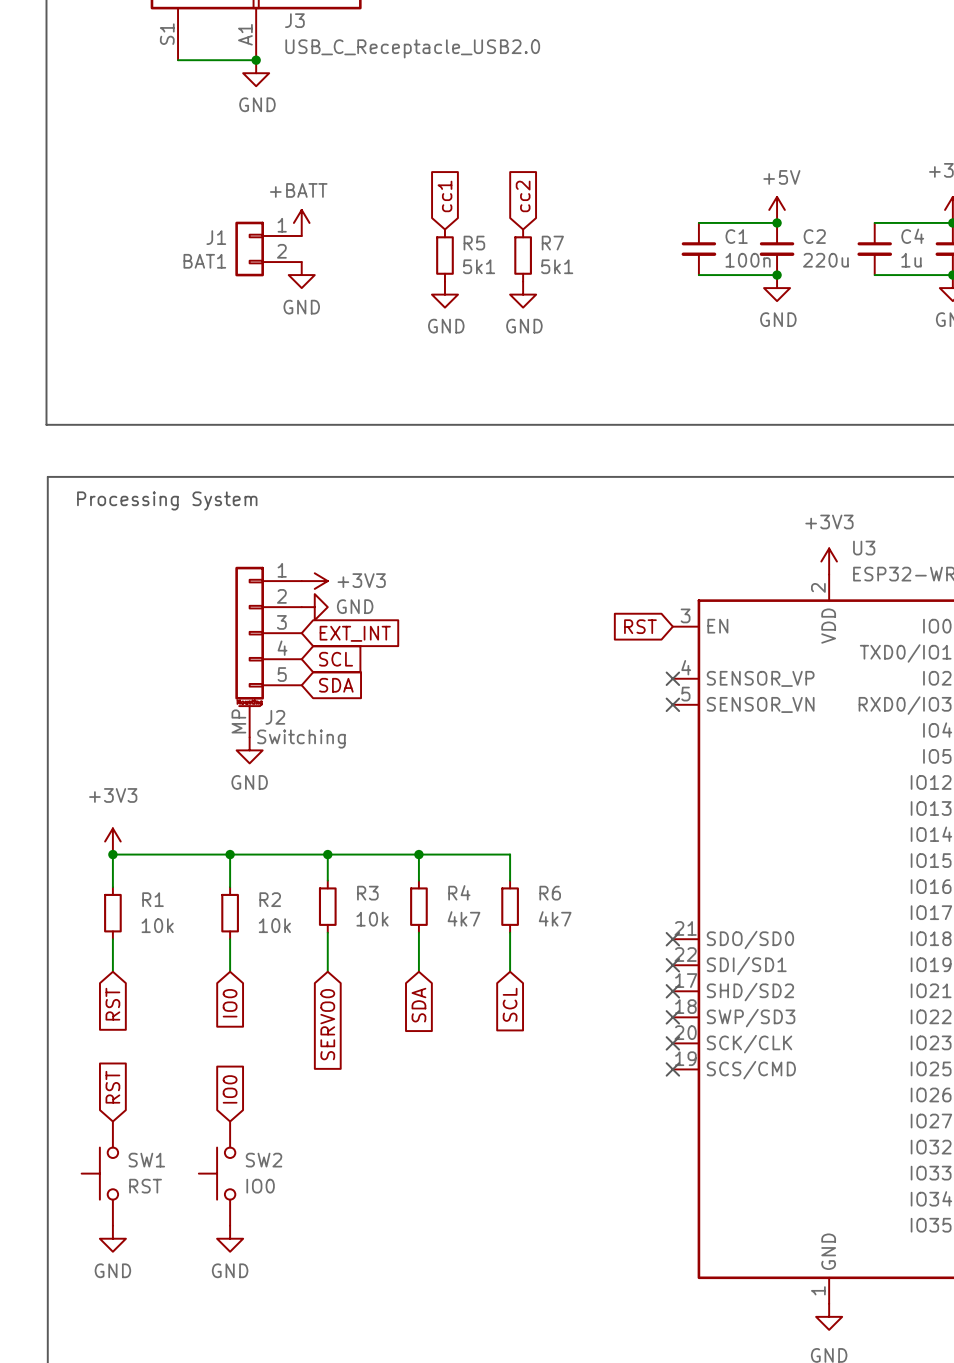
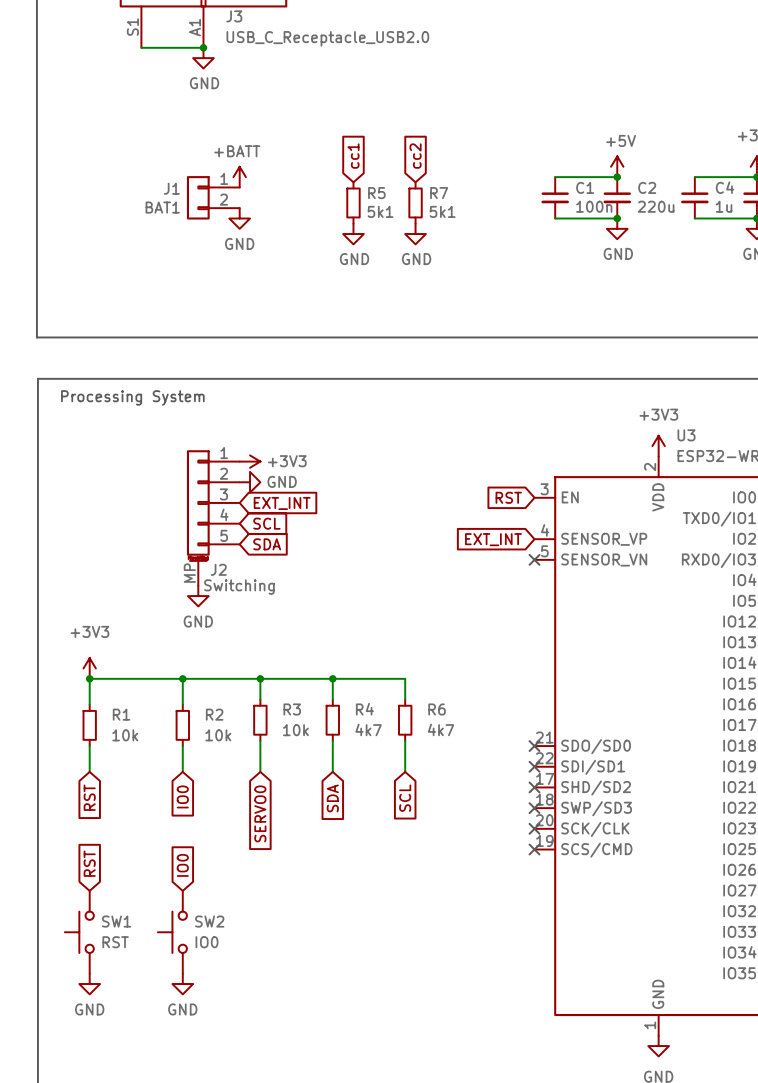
no-connect mark: (672, 678) -> none
global label: none -> EXT_INT (493, 539)

